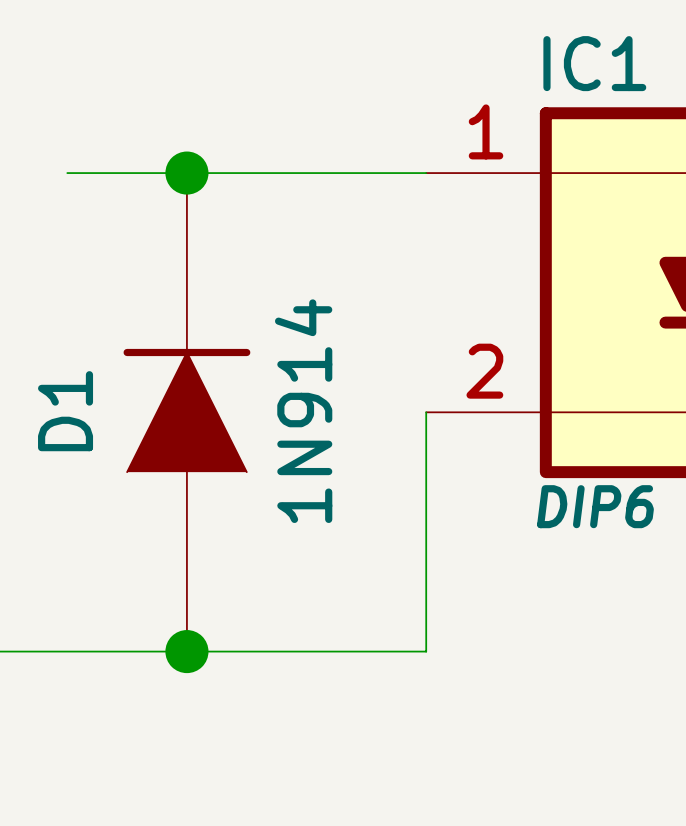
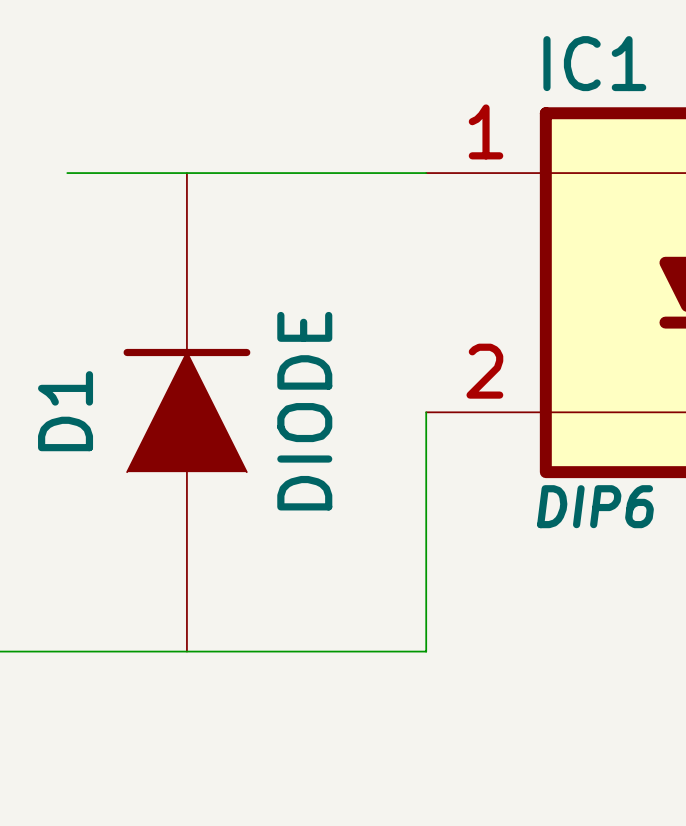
junction: (186, 173) -> none
D1 value: 1N914 (303, 411) -> DIODE (304, 411)
junction: (186, 651) -> none

